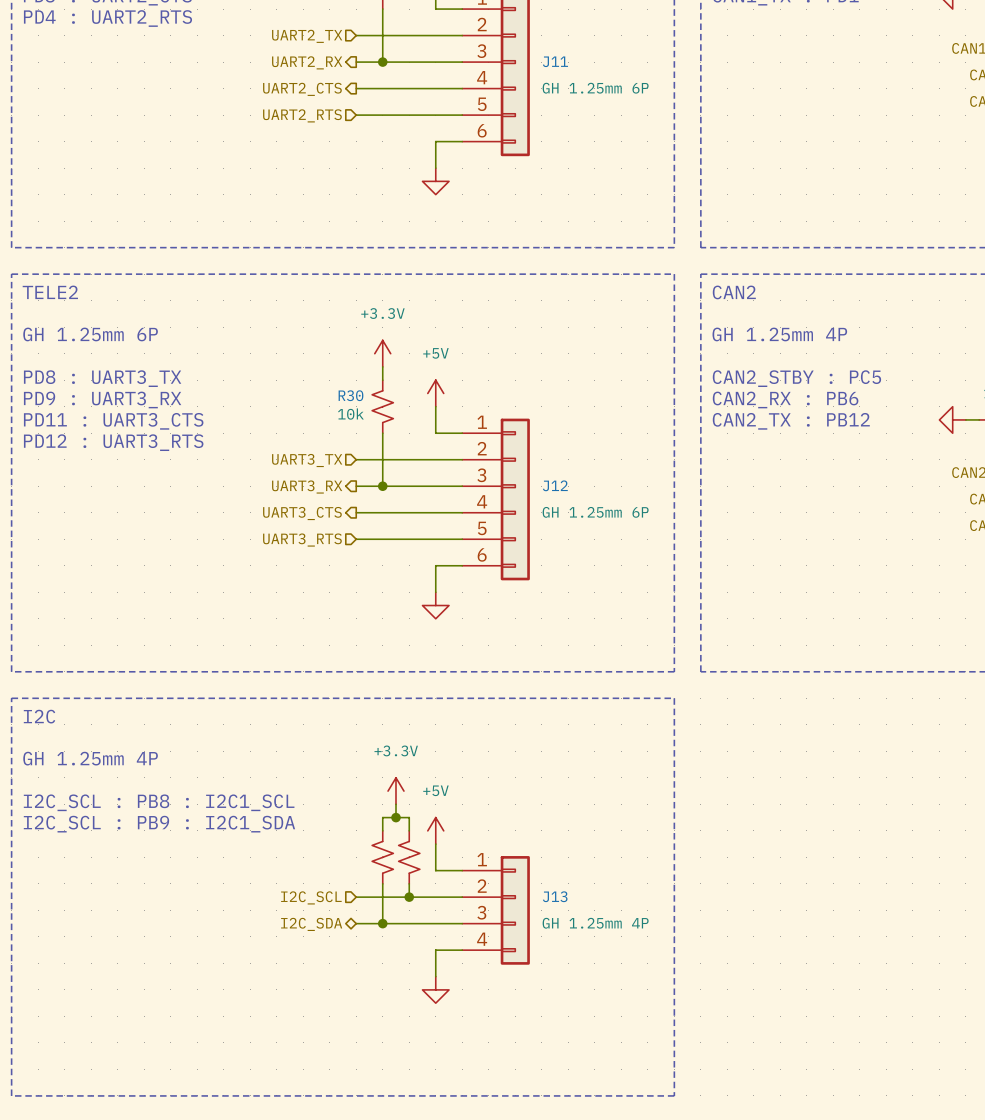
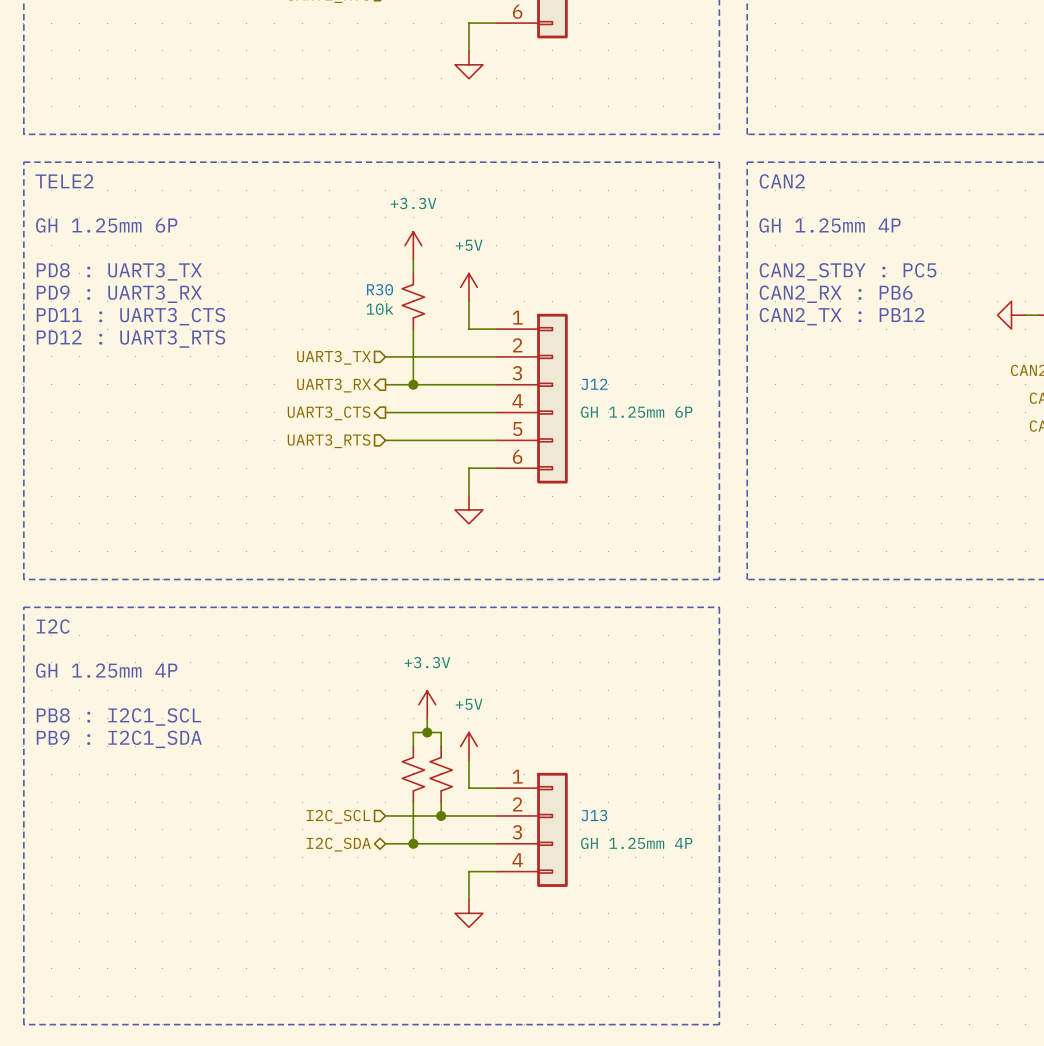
text: I2C_SCL : PB8 : I2C1_SCL (159, 802) -> PB8 : I2C1_SCL (118, 716)
text: I2C_SCL : PB9 : I2C1_SDA (159, 824) -> PB9 : I2C1_SDA (119, 739)

